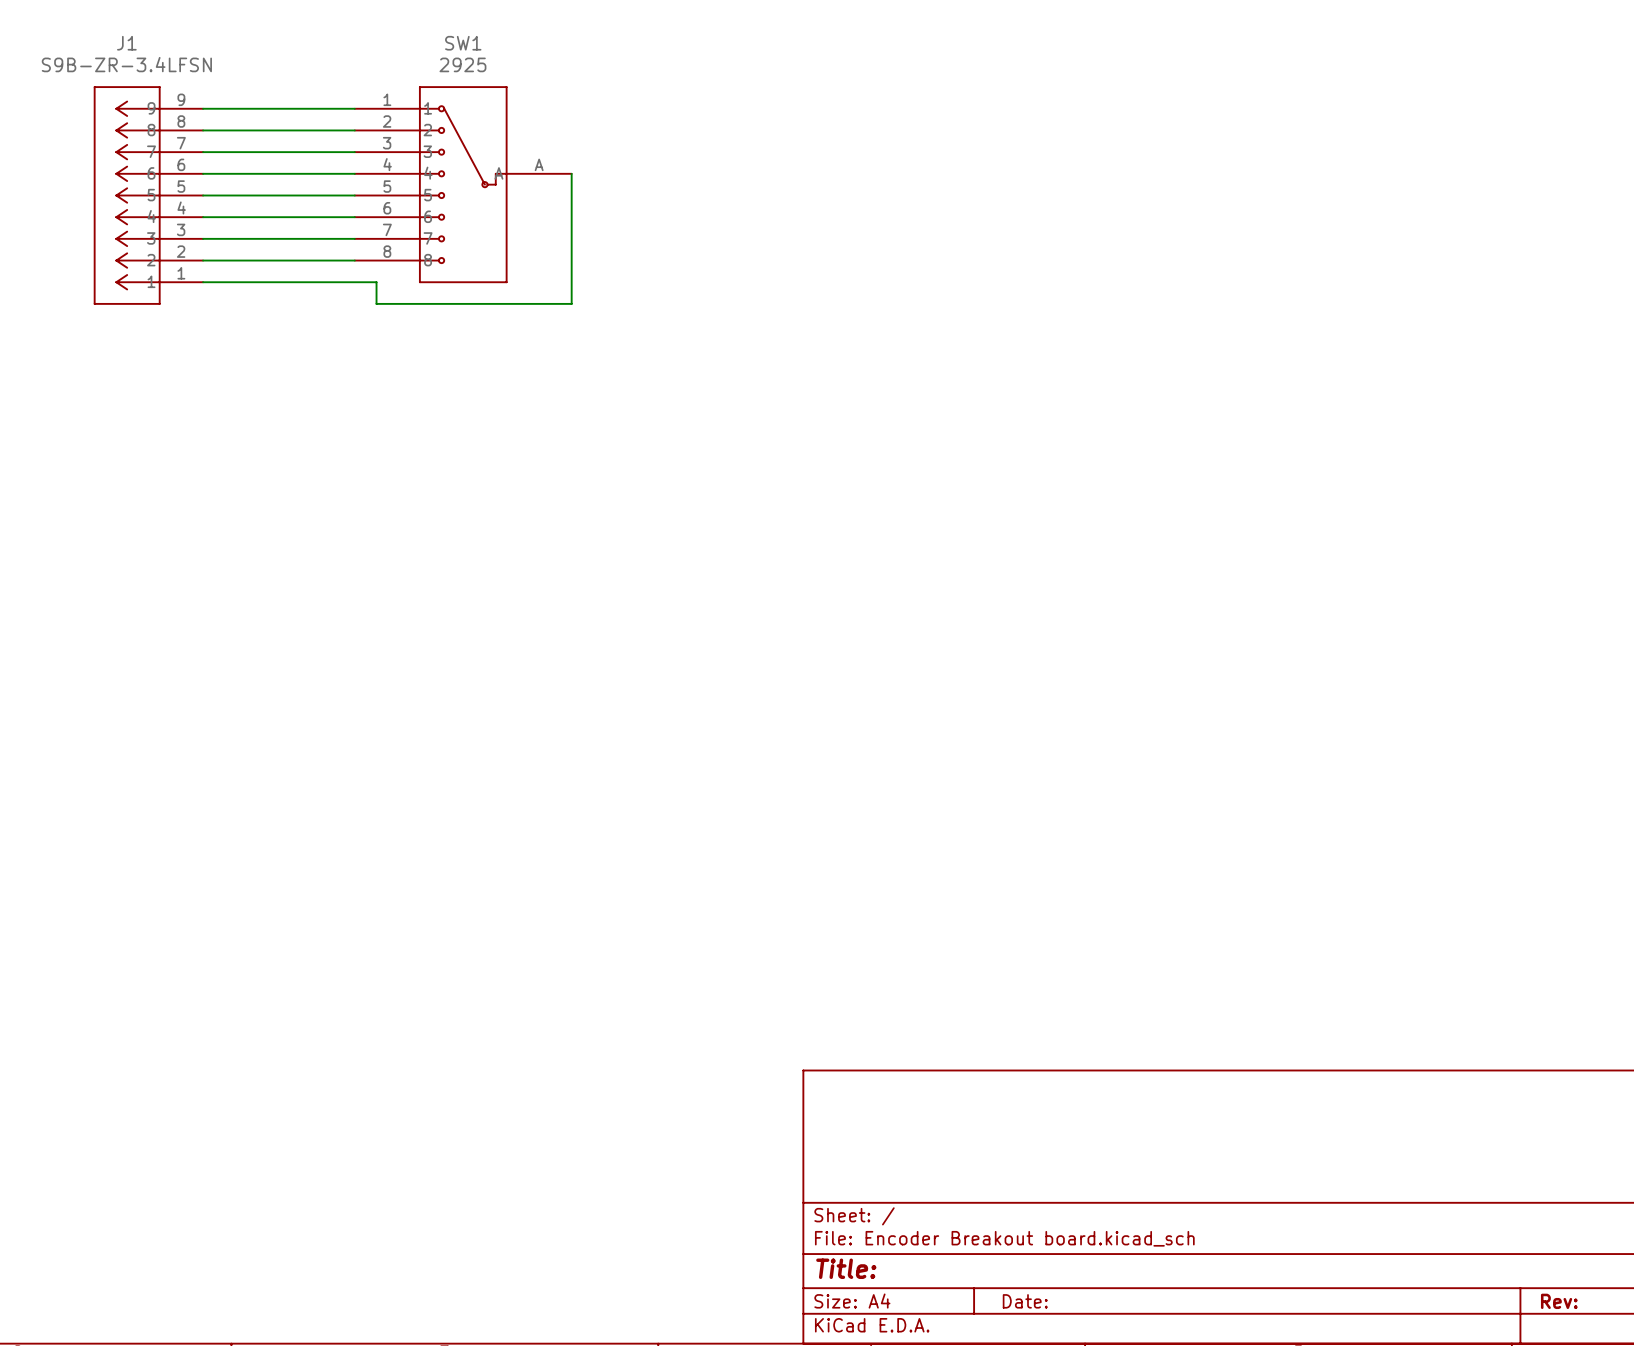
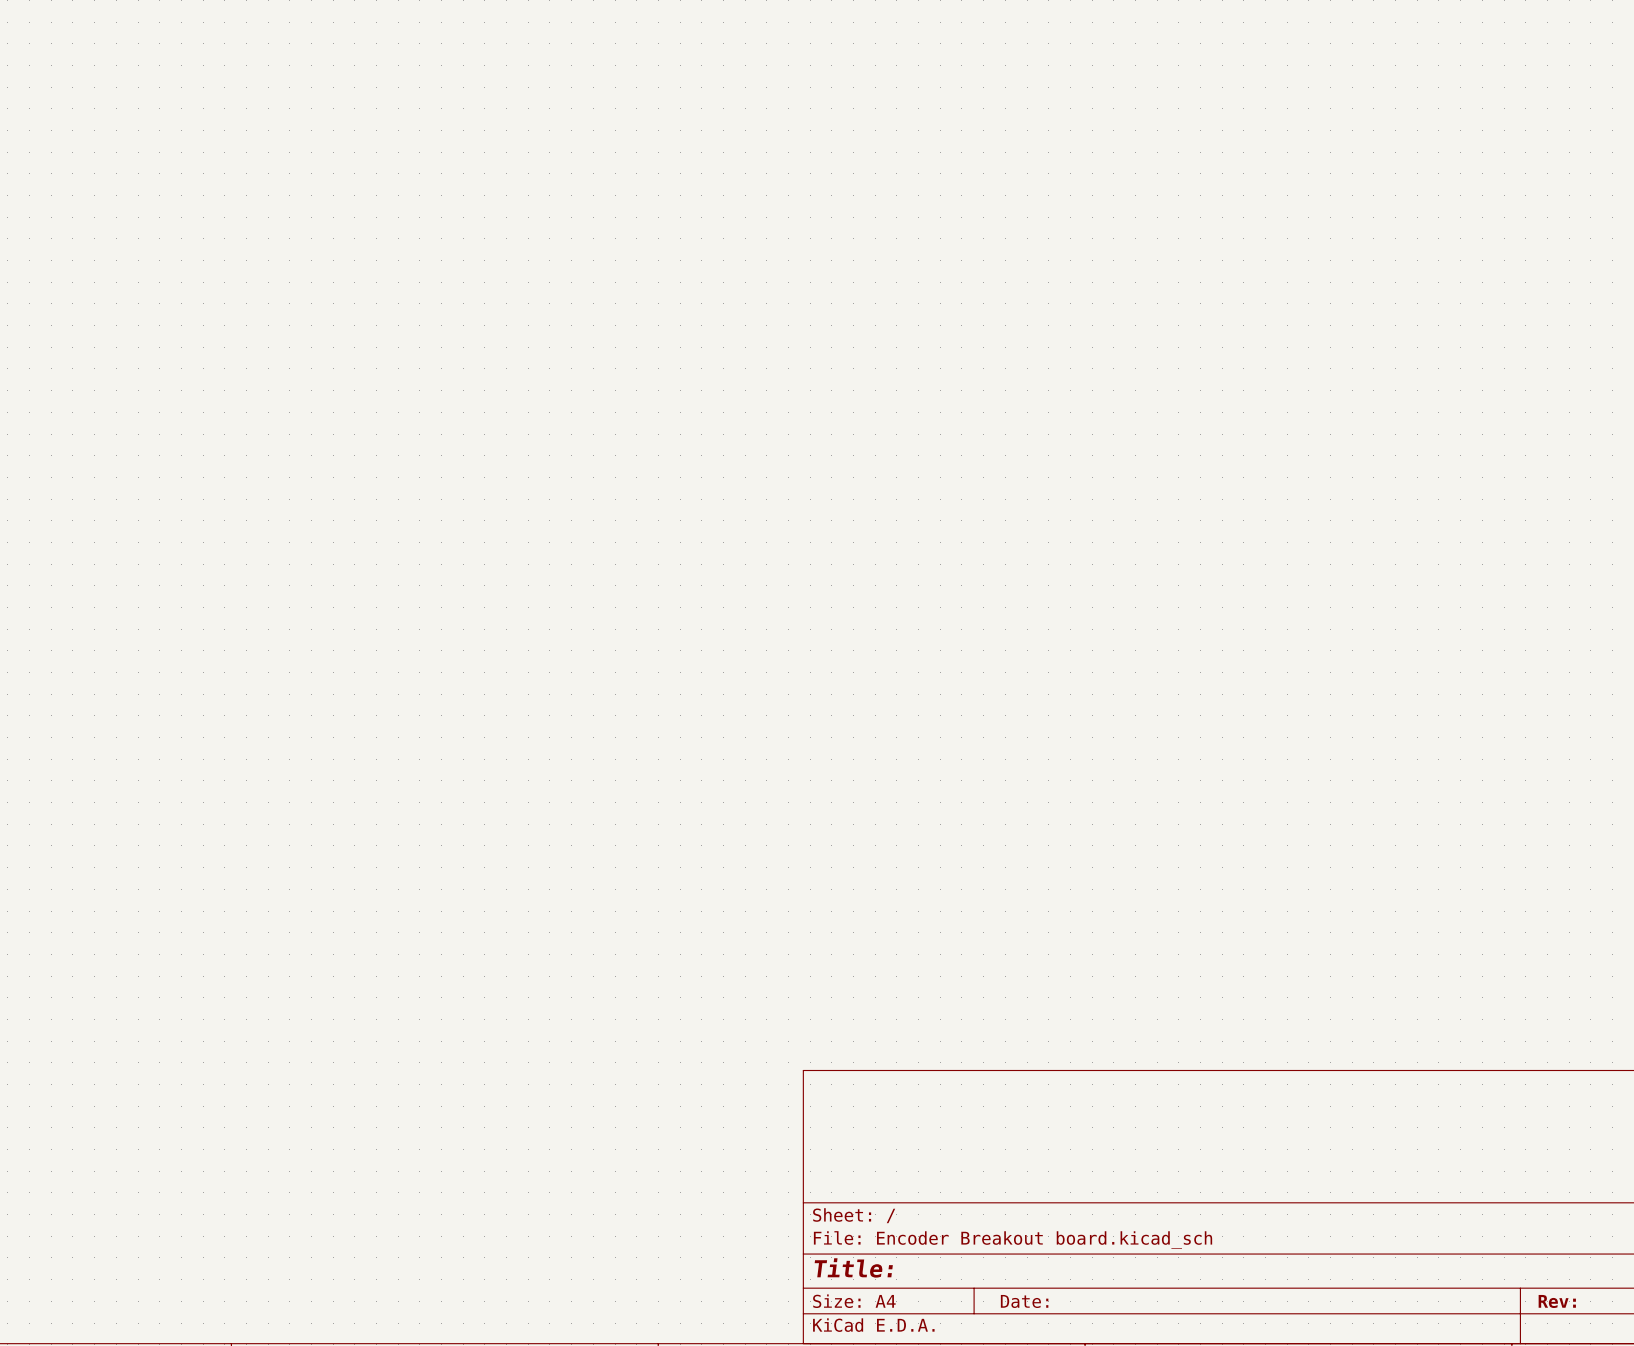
wire: (203, 108) (354, 108) -> none
wire: (203, 130) (354, 130) -> none
wire: (203, 152) (354, 152) -> none
wire: (203, 173) (354, 173) -> none
wire: (571, 173) (571, 303) (376, 303) (376, 282) (203, 282) -> none
SW1: 2925 (463, 184) -> none
J1: S9B-ZR-3.4LFSN (148, 195) -> none
wire: (203, 195) (354, 195) -> none
wire: (203, 217) (354, 217) -> none
wire: (203, 238) (354, 238) -> none
wire: (203, 260) (354, 260) -> none

